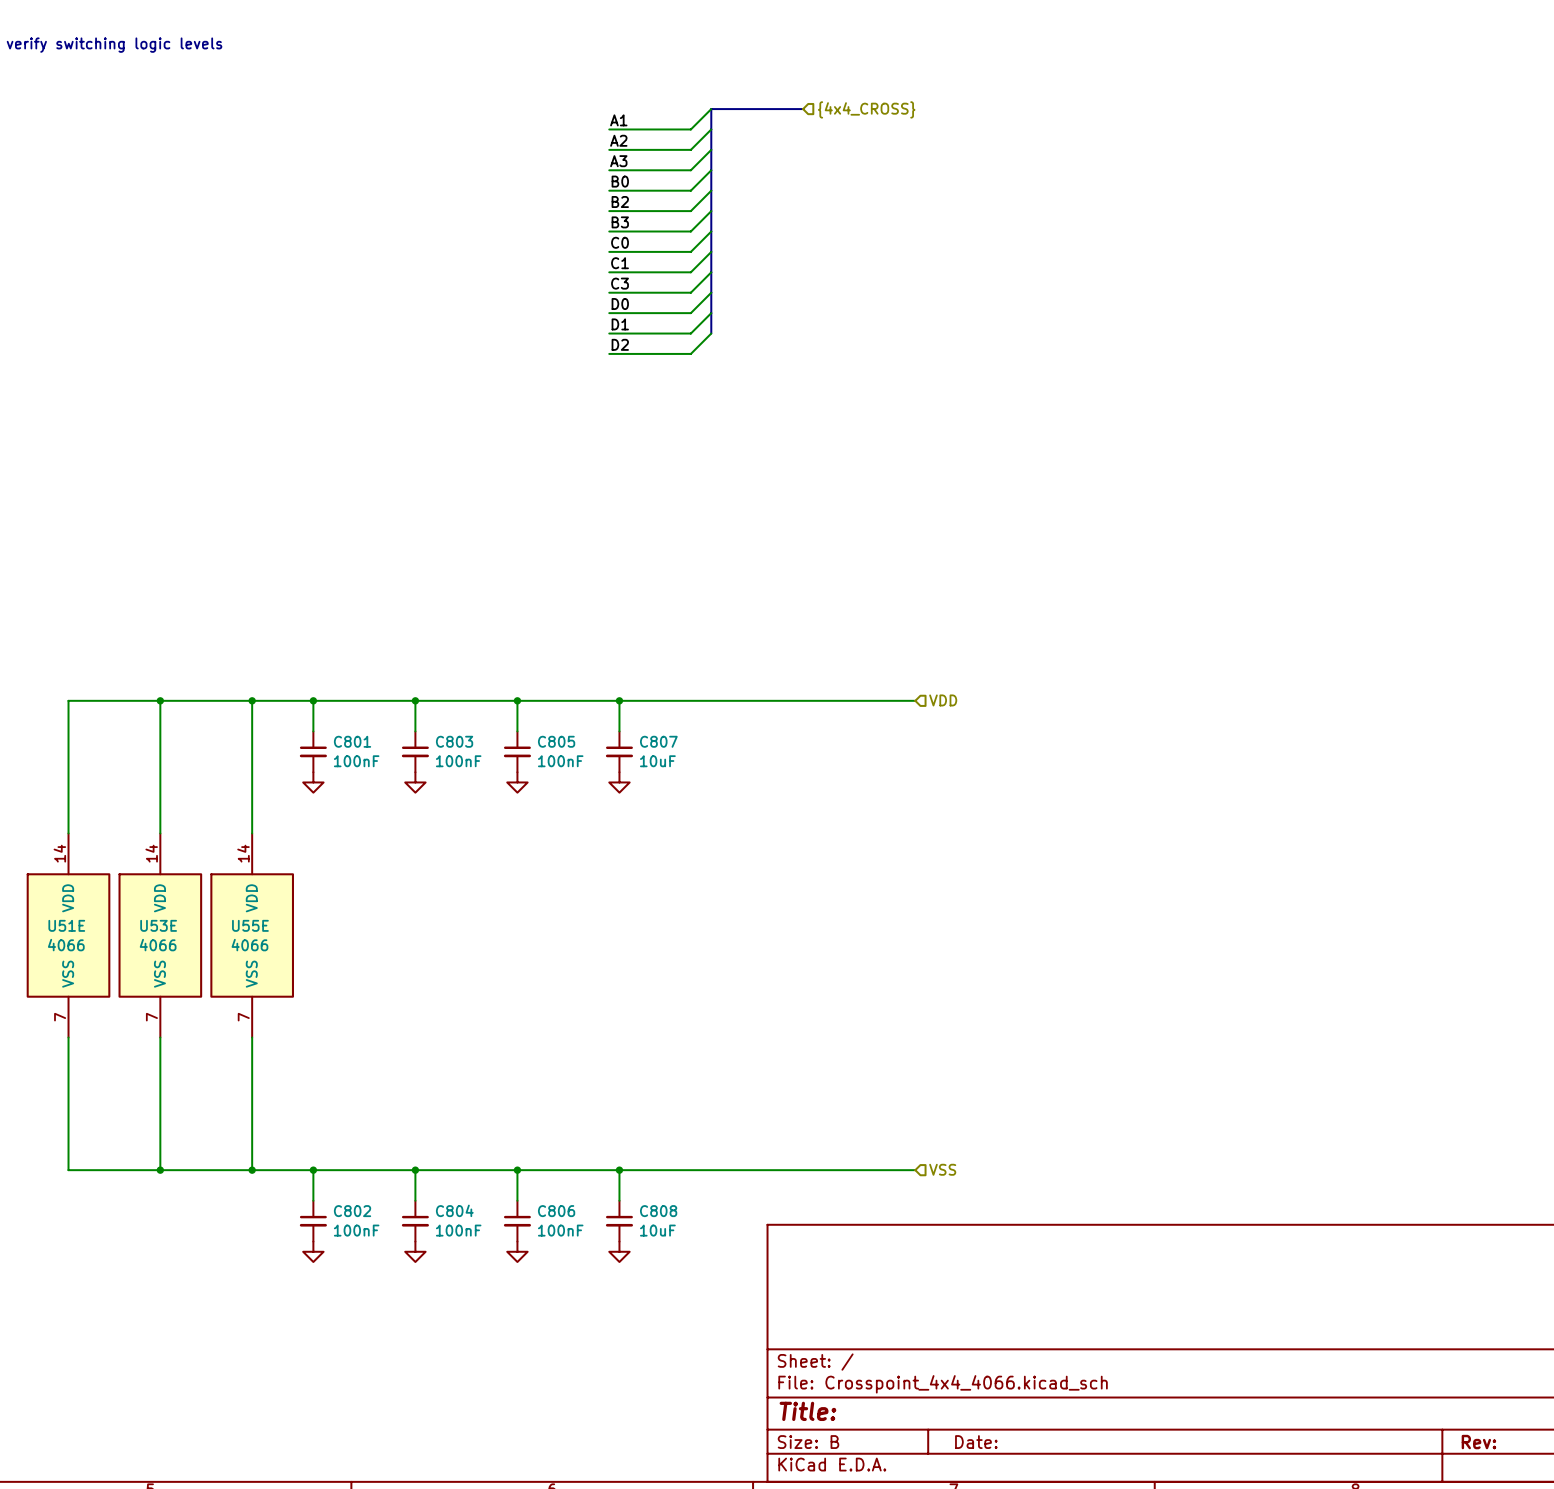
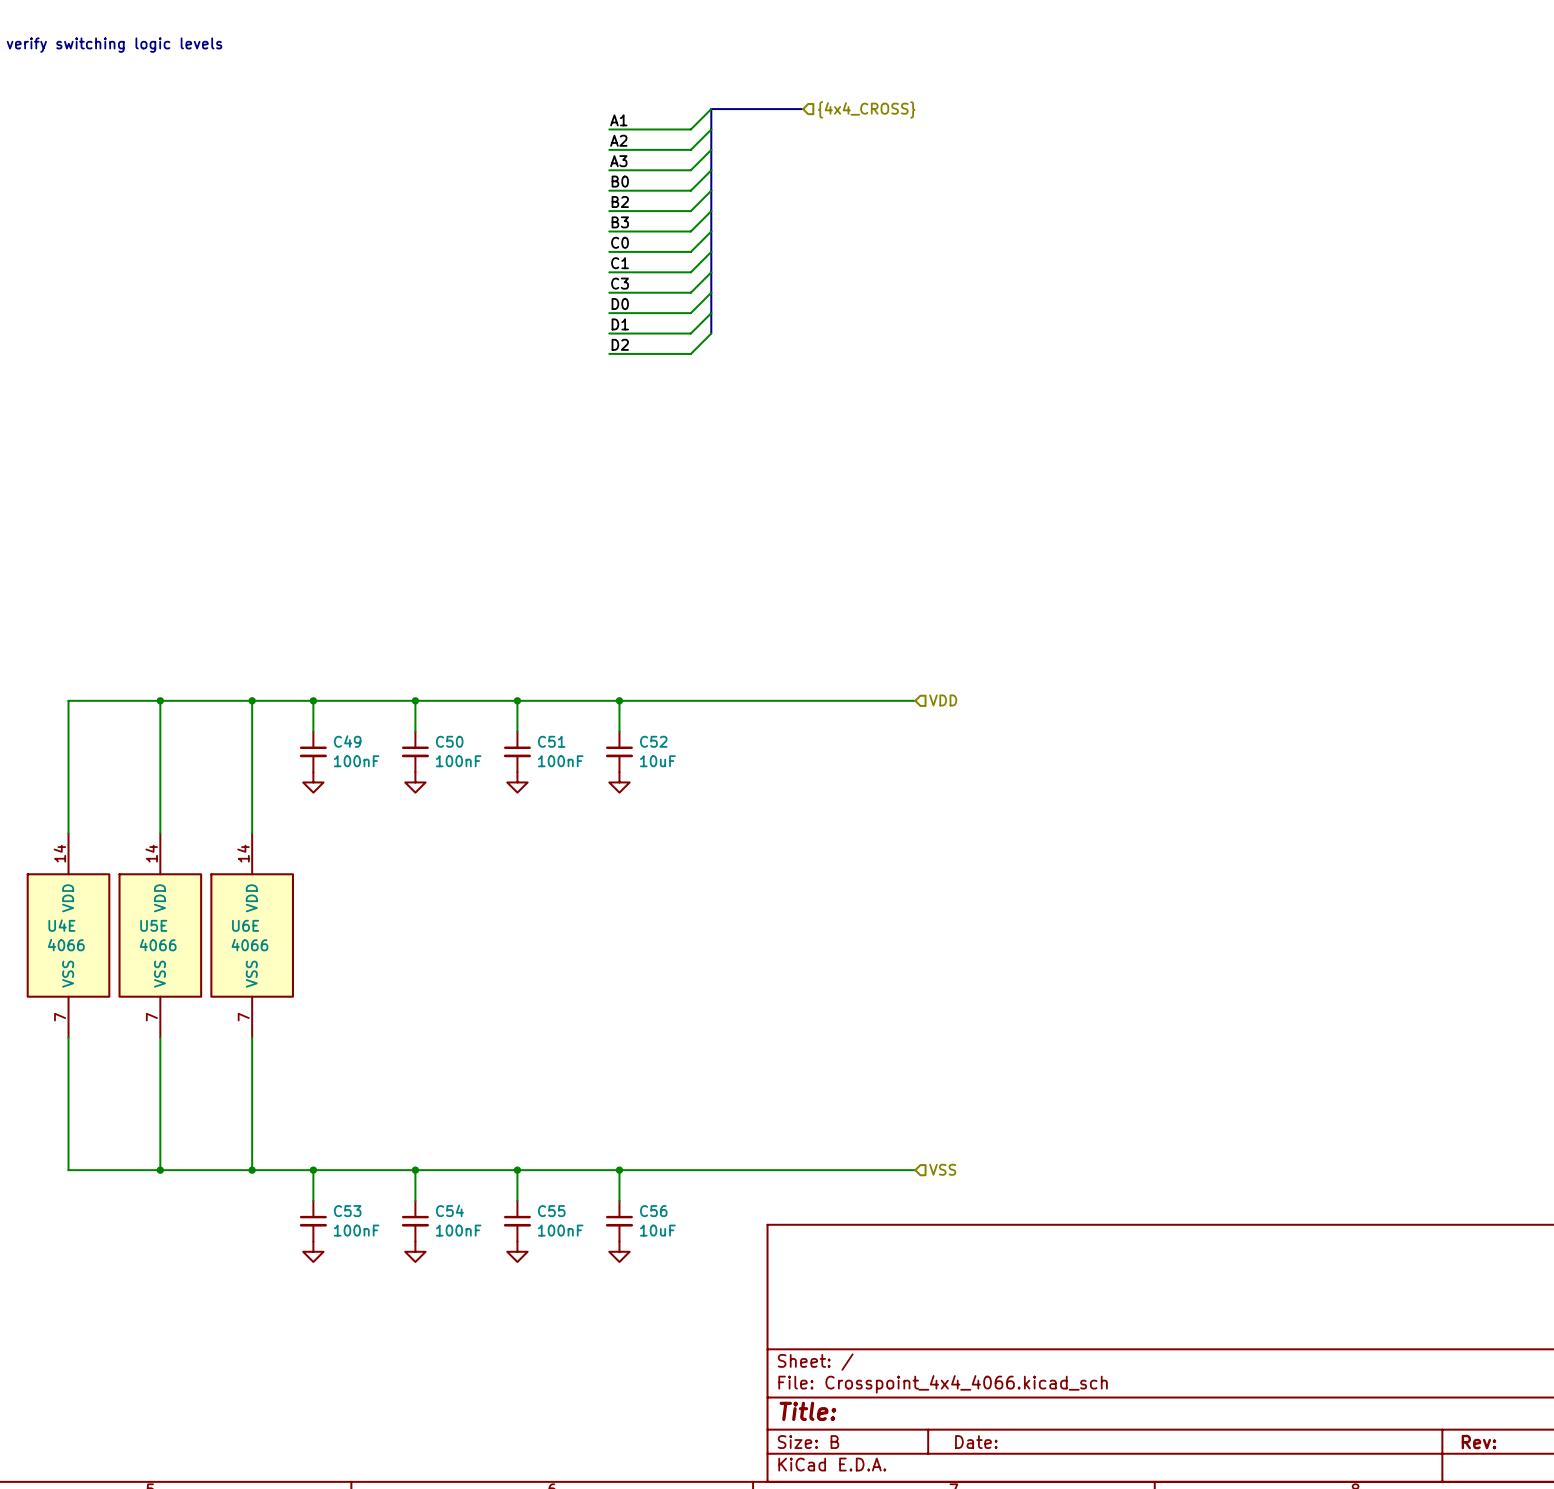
C801 name: C801 (352, 741) -> C49 (347, 741)
C803 name: C803 (454, 741) -> C50 (449, 741)
C805 name: C805 (556, 741) -> C51 (551, 741)
C807 name: C807 (658, 741) -> C52 (653, 741)
U51E name: U51E (66, 925) -> U4E (61, 925)
U53E name: U53E (158, 925) -> U5E (153, 925)
U55E name: U55E (250, 925) -> U6E (245, 925)
C804 name: C804 (454, 1210) -> C54 (449, 1210)
C802 name: C802 (352, 1211) -> C53 (347, 1211)
C806 name: C806 (556, 1211) -> C55 (551, 1211)
C808 name: C808 (658, 1211) -> C56 (653, 1211)

